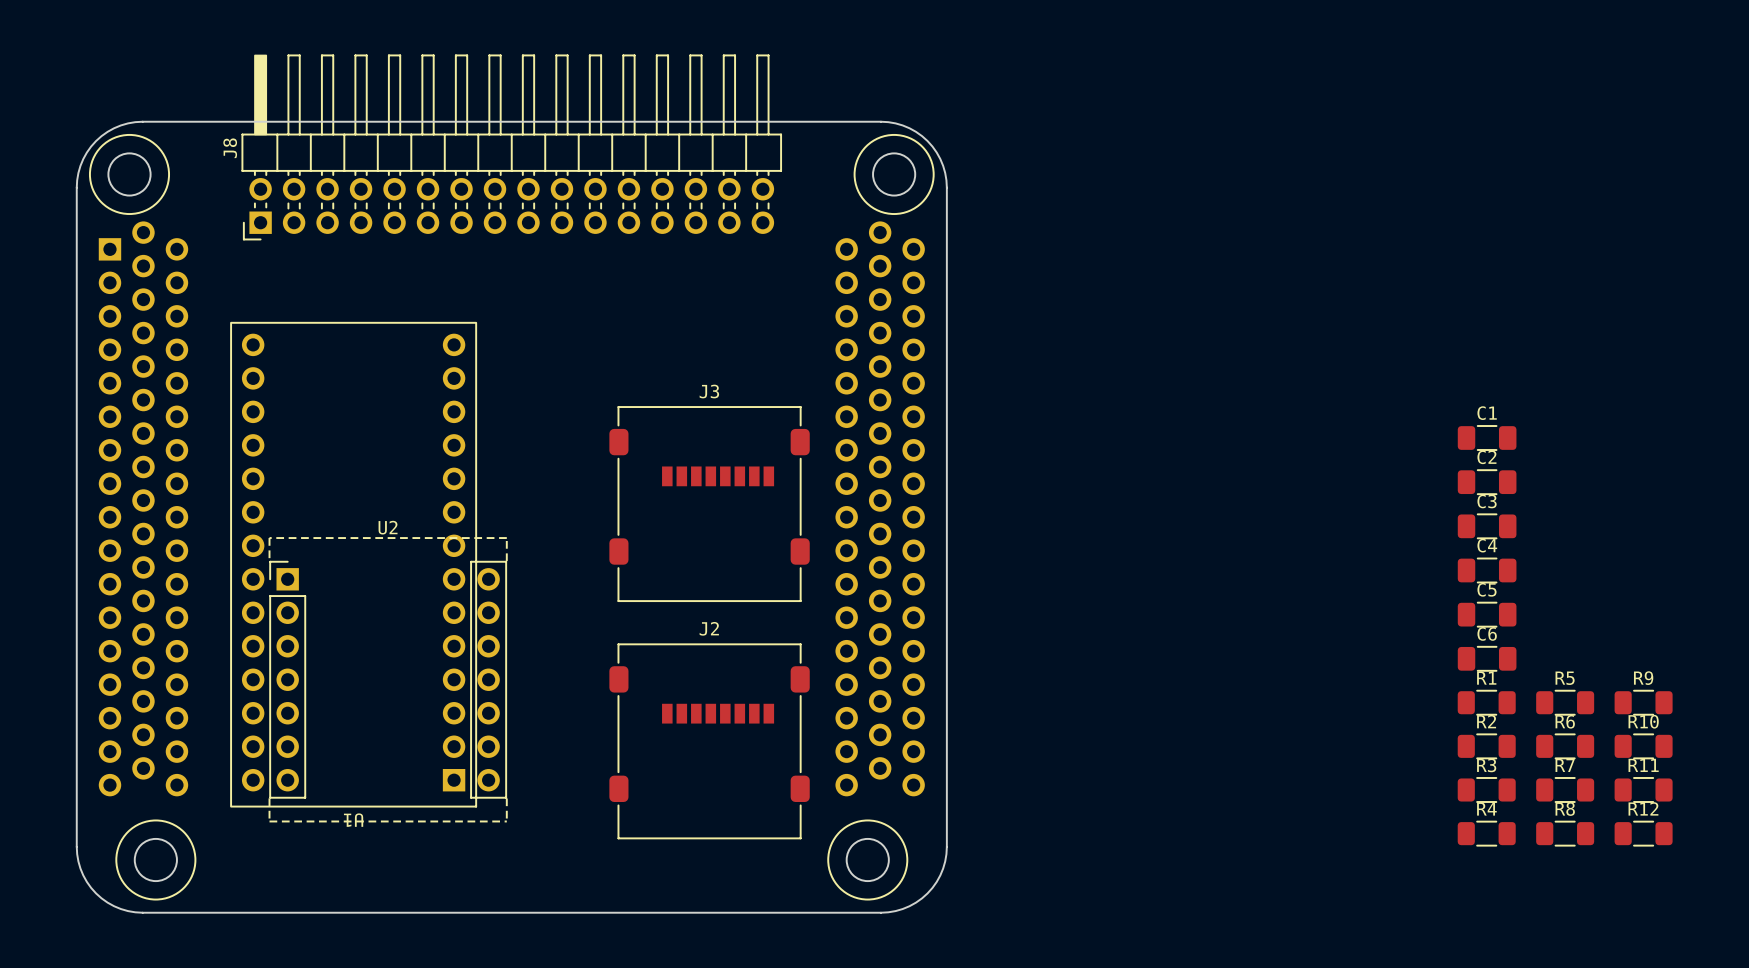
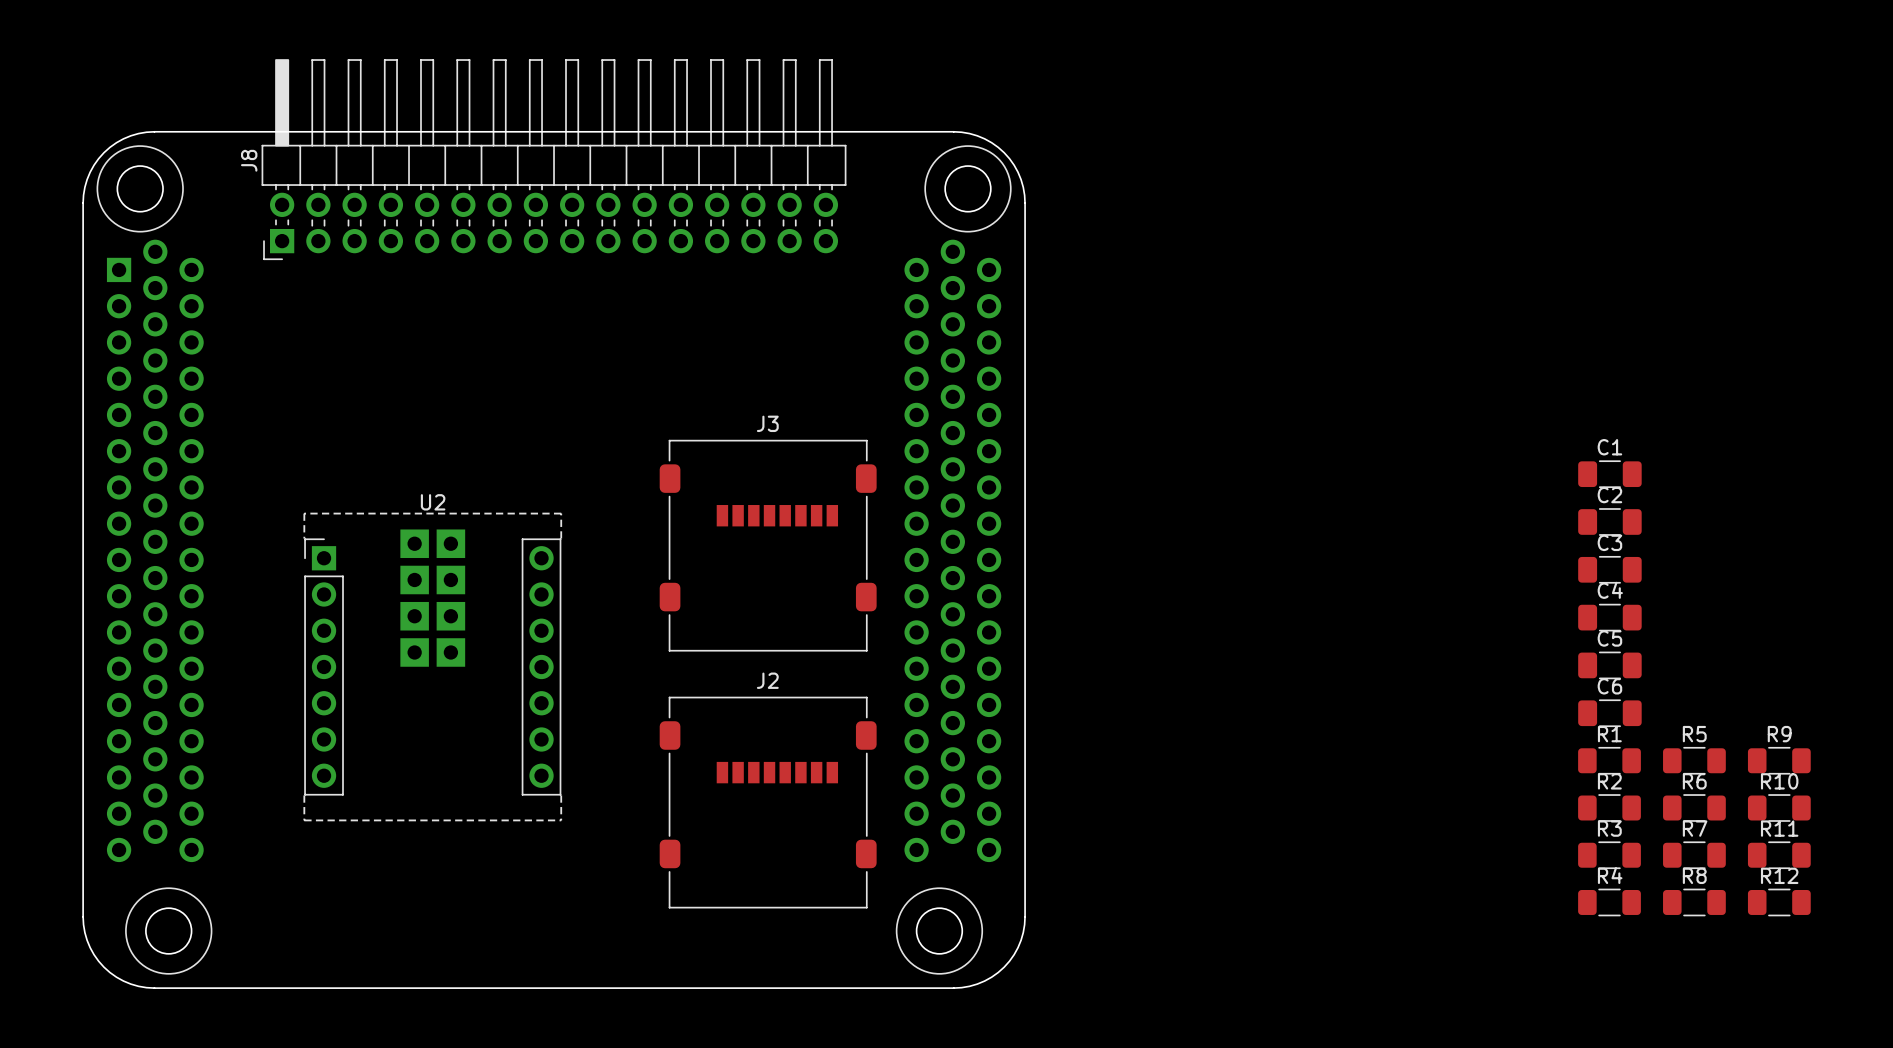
U2 footprint: [268, 537, 508, 823] -> [303, 512, 563, 822]
U1: (353, 564) -> none

